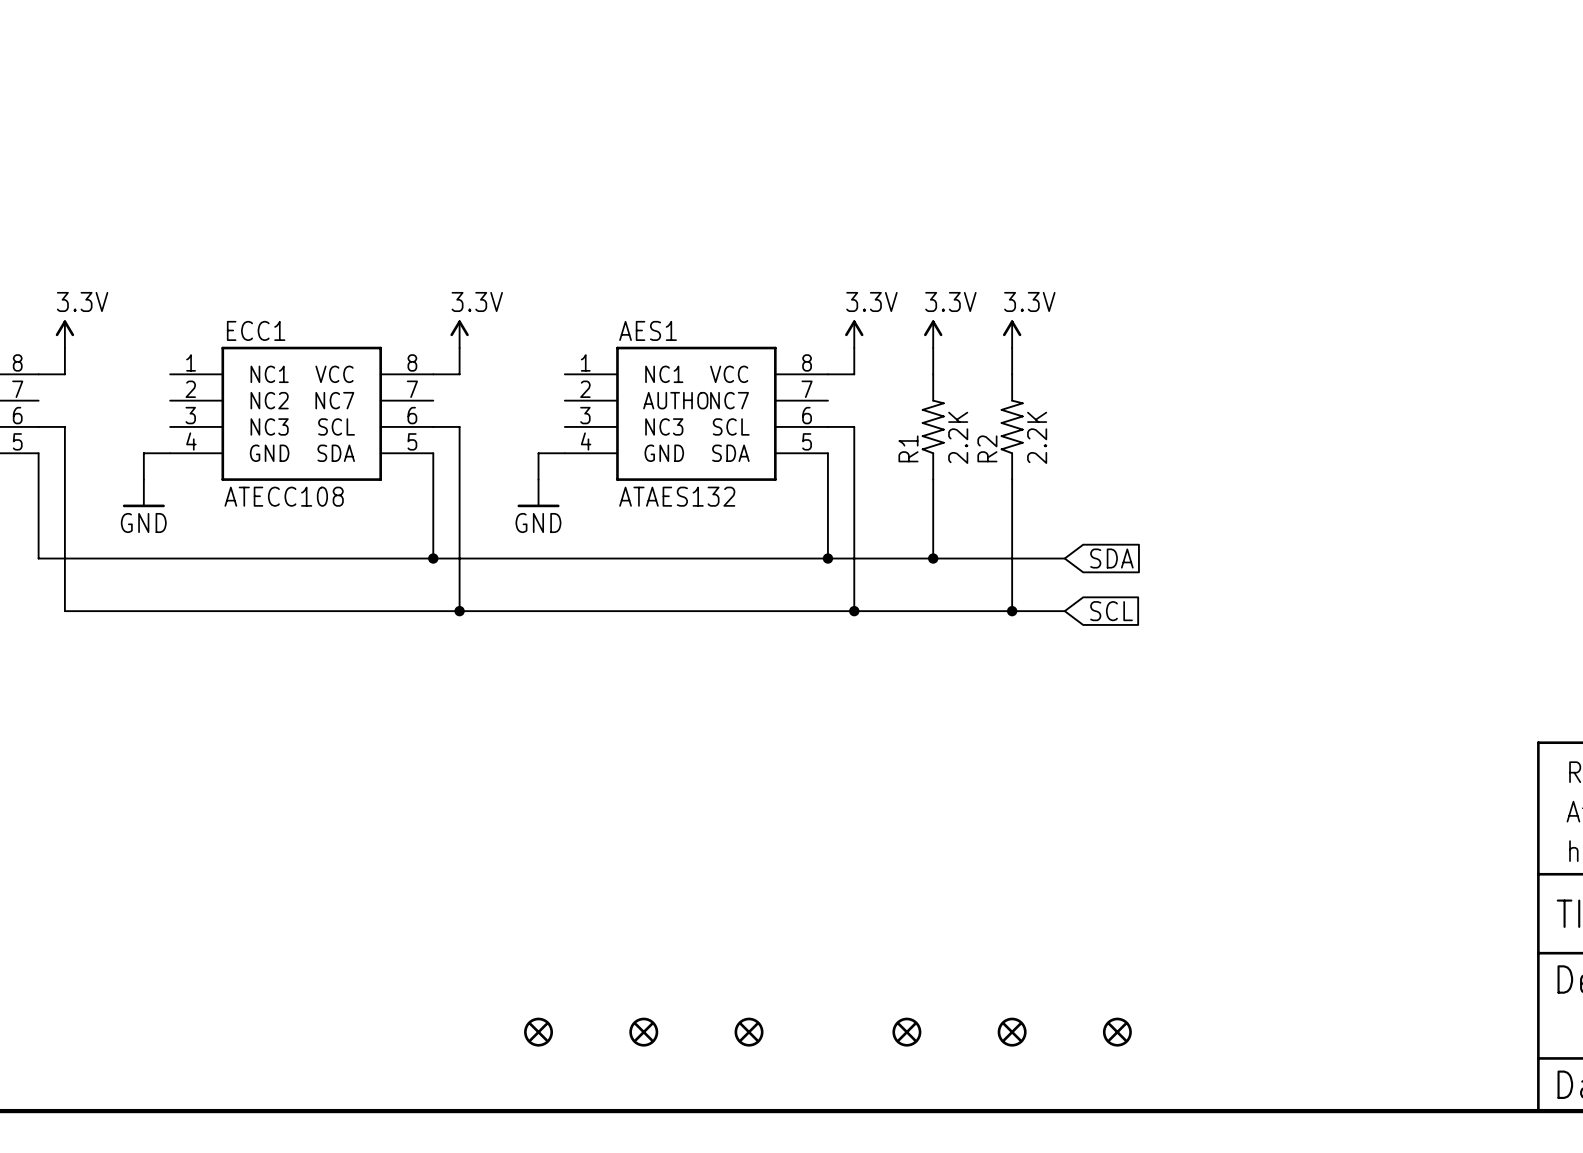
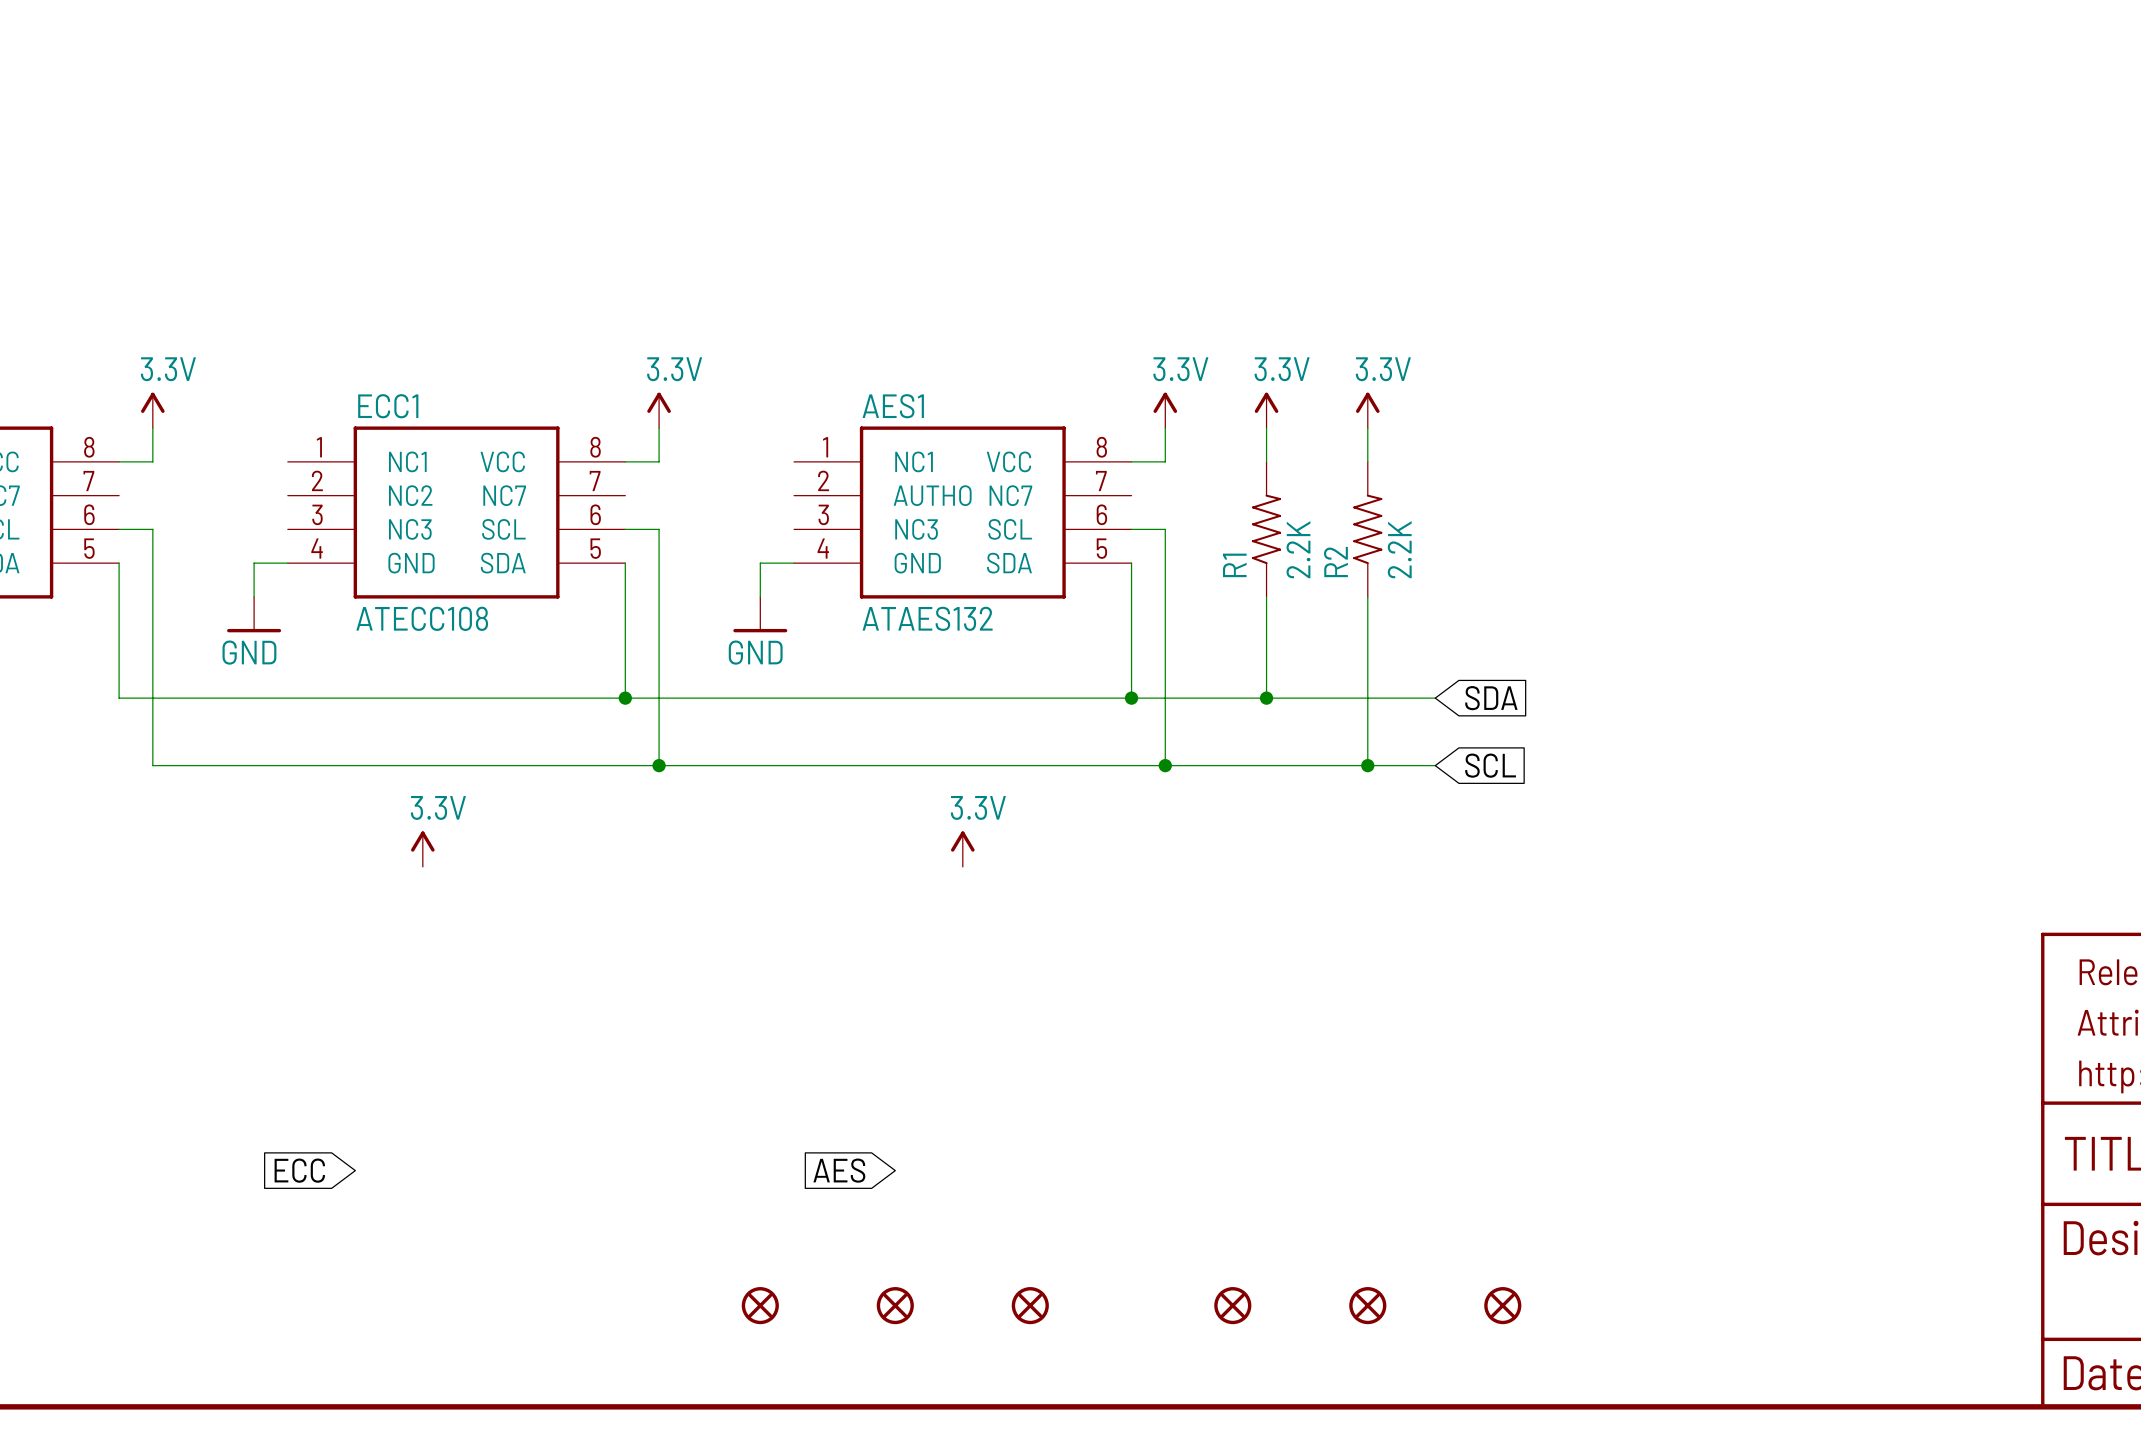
power symbol: none -> 3.3V (422, 849)
power symbol: none -> 3.3V (962, 849)
global label: none -> ECC (299, 1170)
global label: none -> AES (839, 1170)

